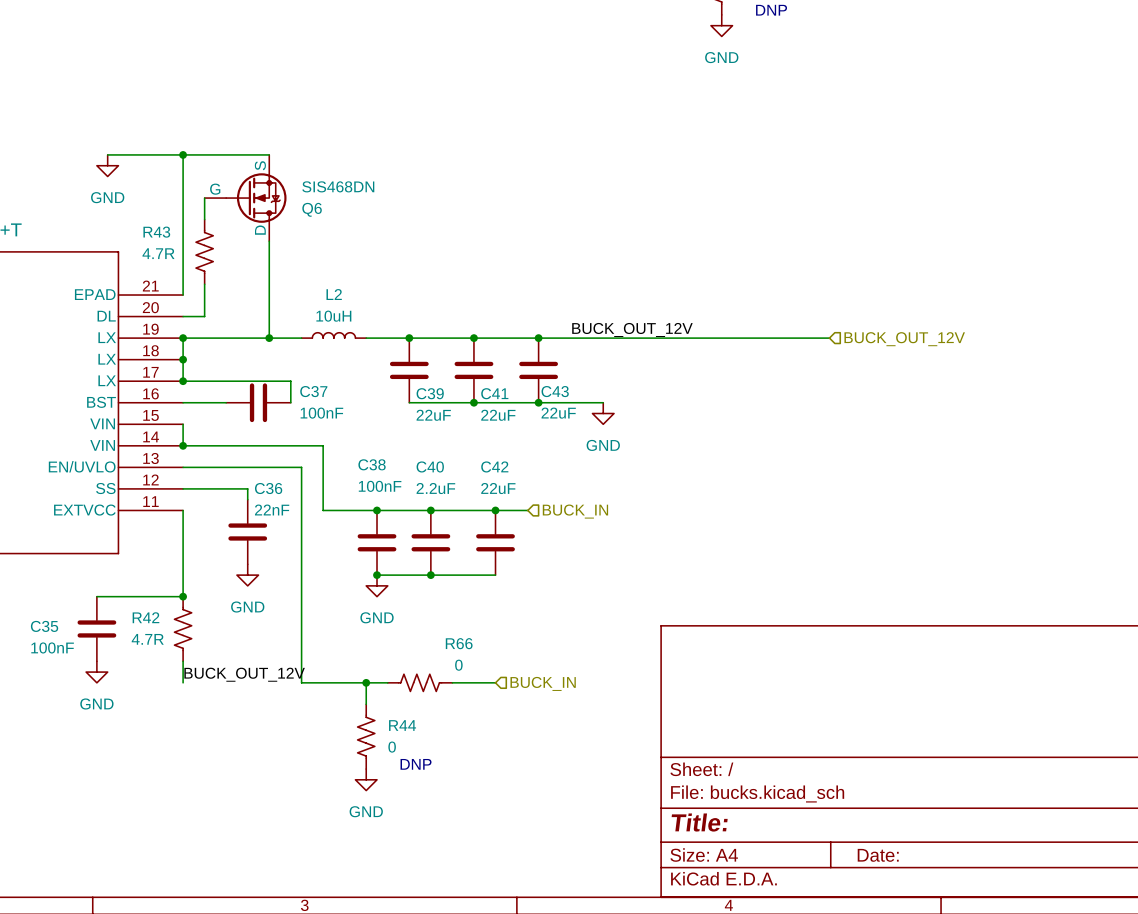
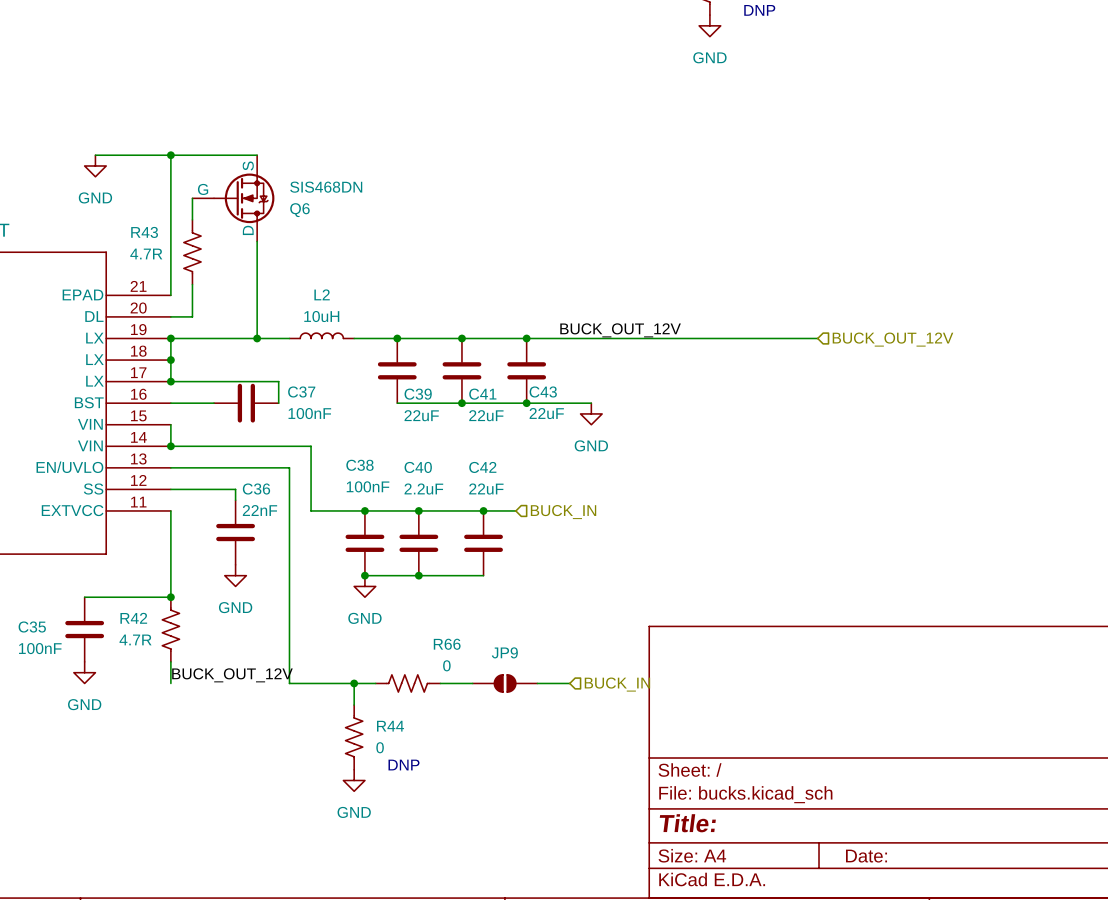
JP9: none -> (505, 683)
wire: none -> (537, 683) (569, 683)
hierarchical label position: BUCK_IN (543, 683) -> BUCK_IN (617, 684)

